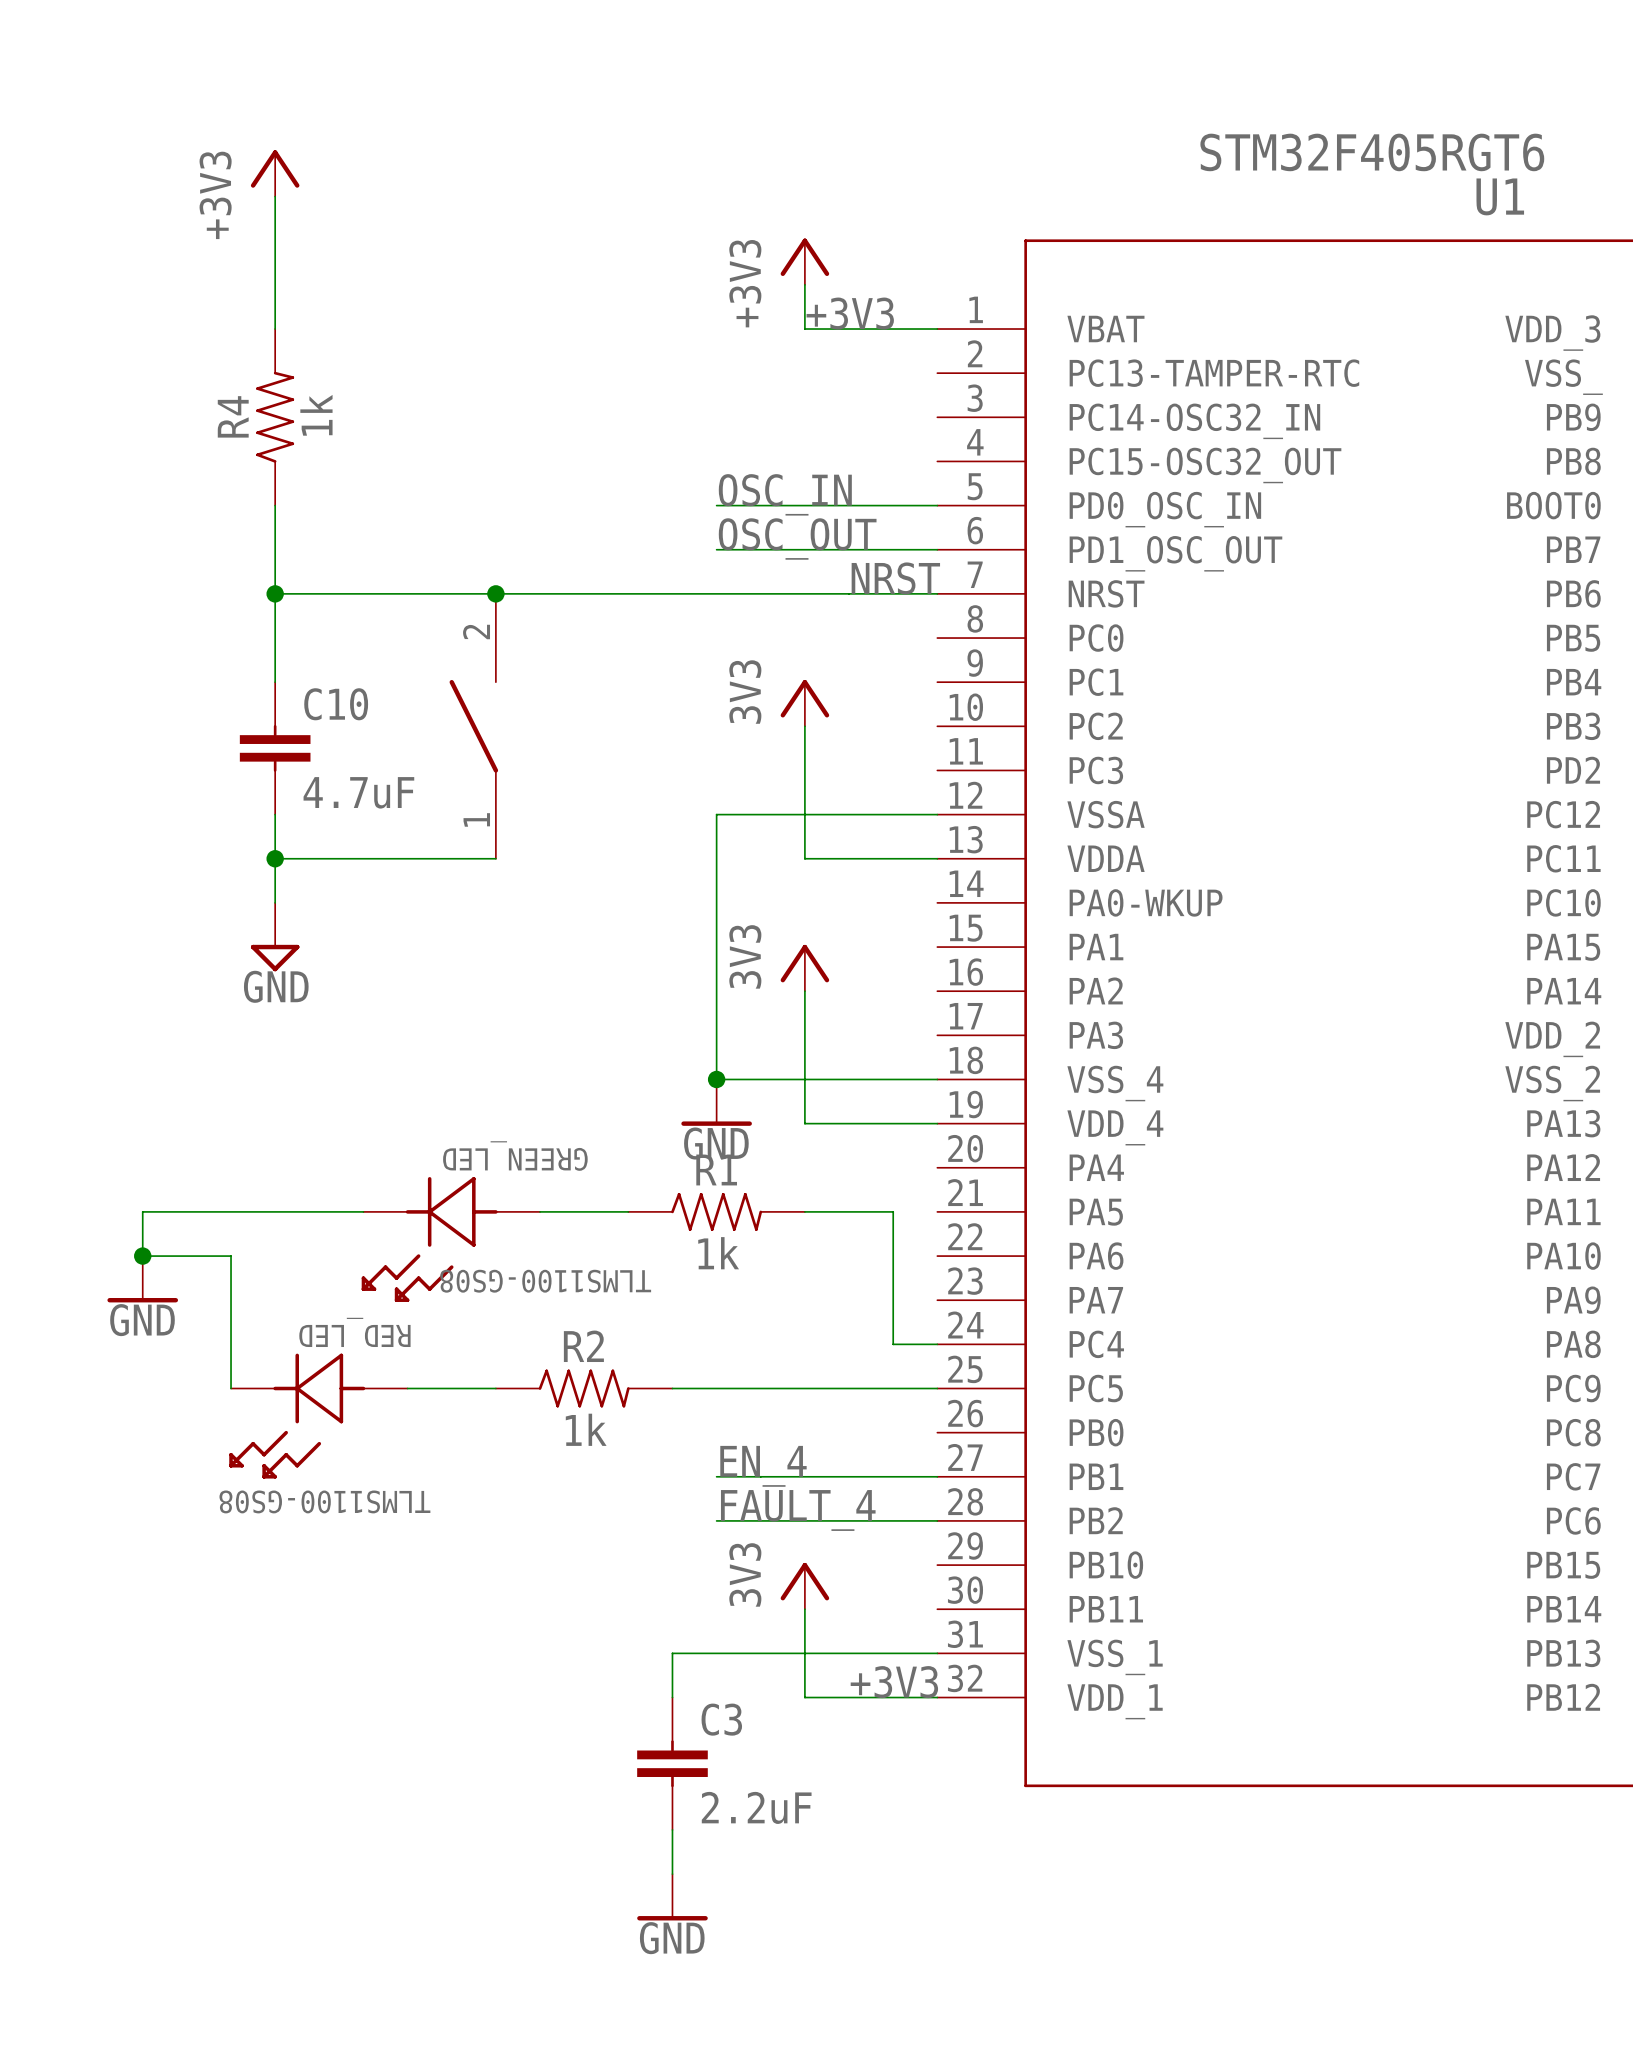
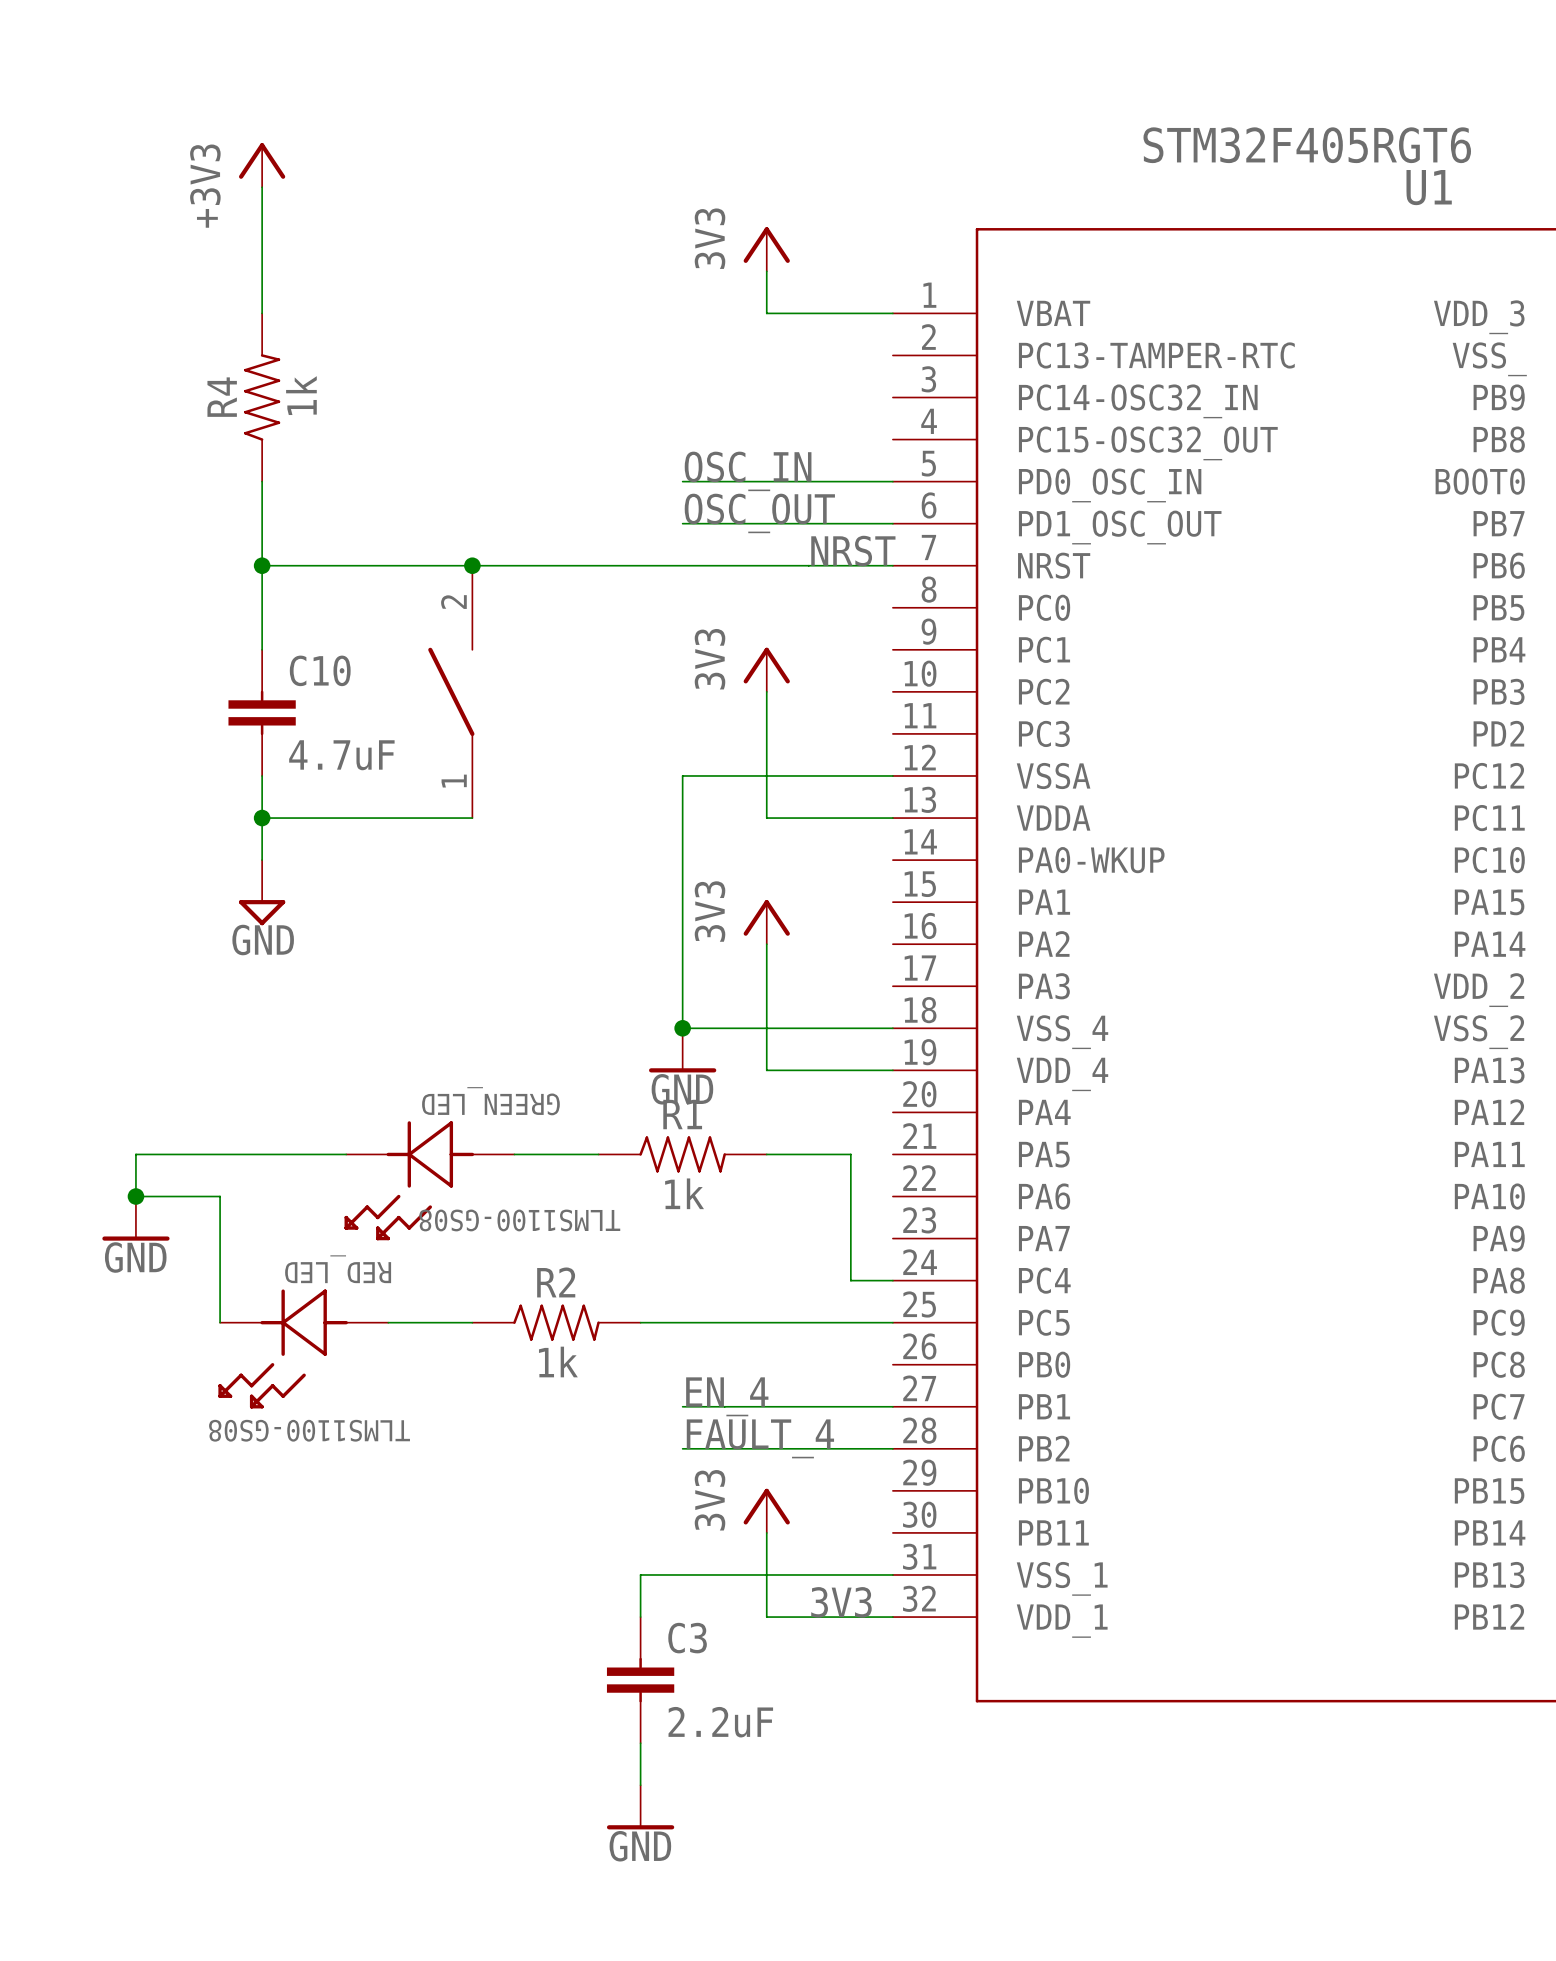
power symbol: +3V3 (804, 261) -> 3V3 (766, 249)
label: +3V3 (850, 313) -> none
label: +3V3 (894, 1682) -> 3V3 (841, 1602)

